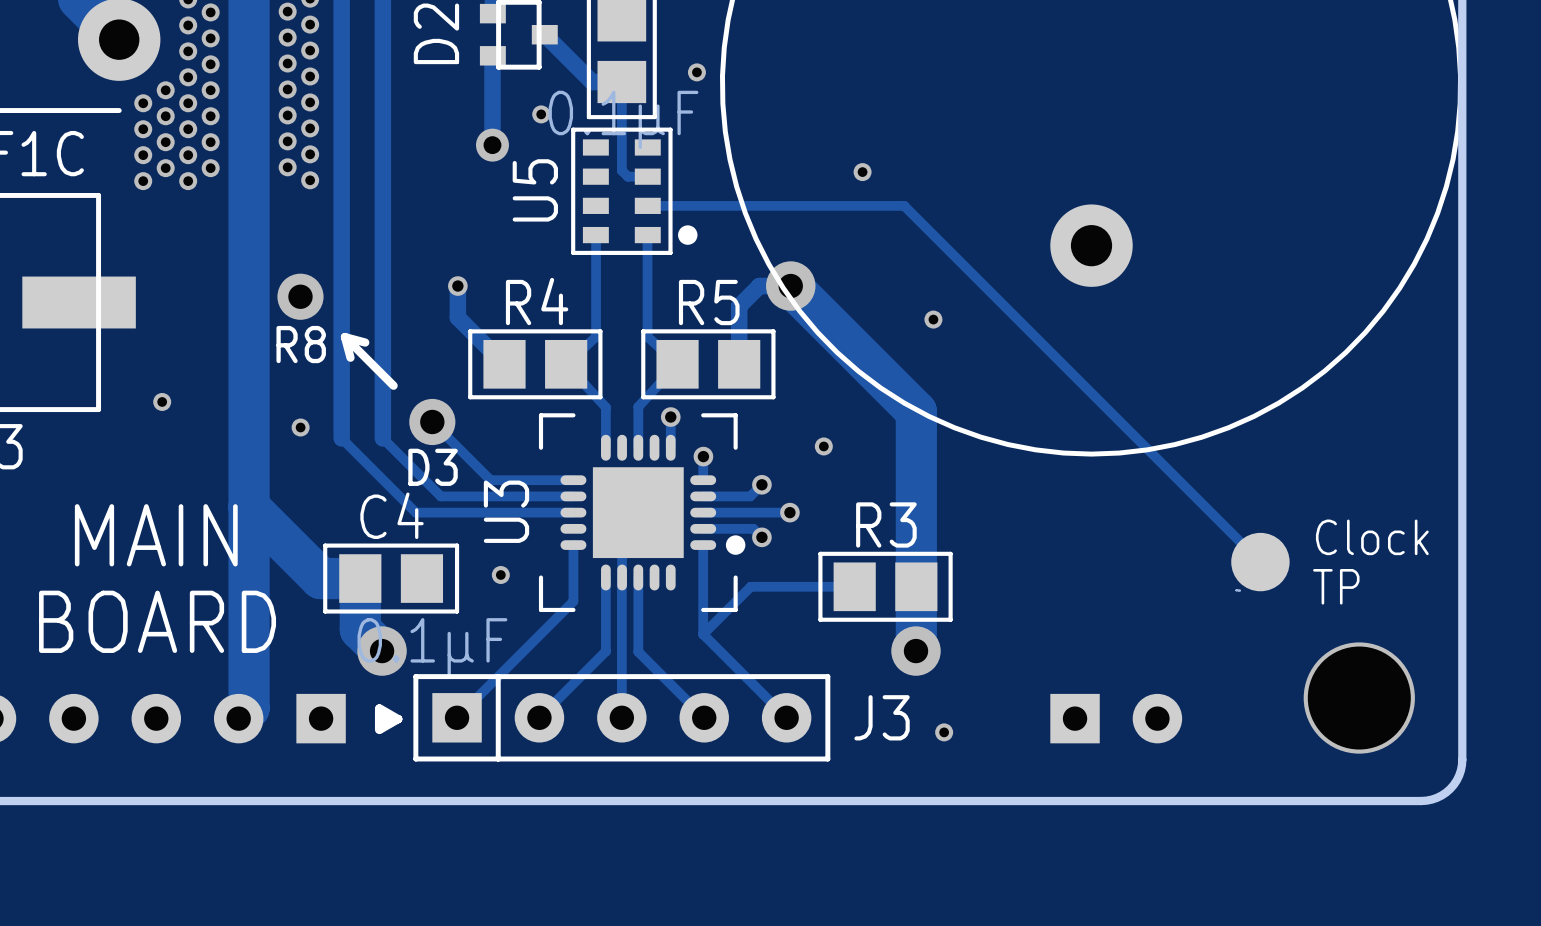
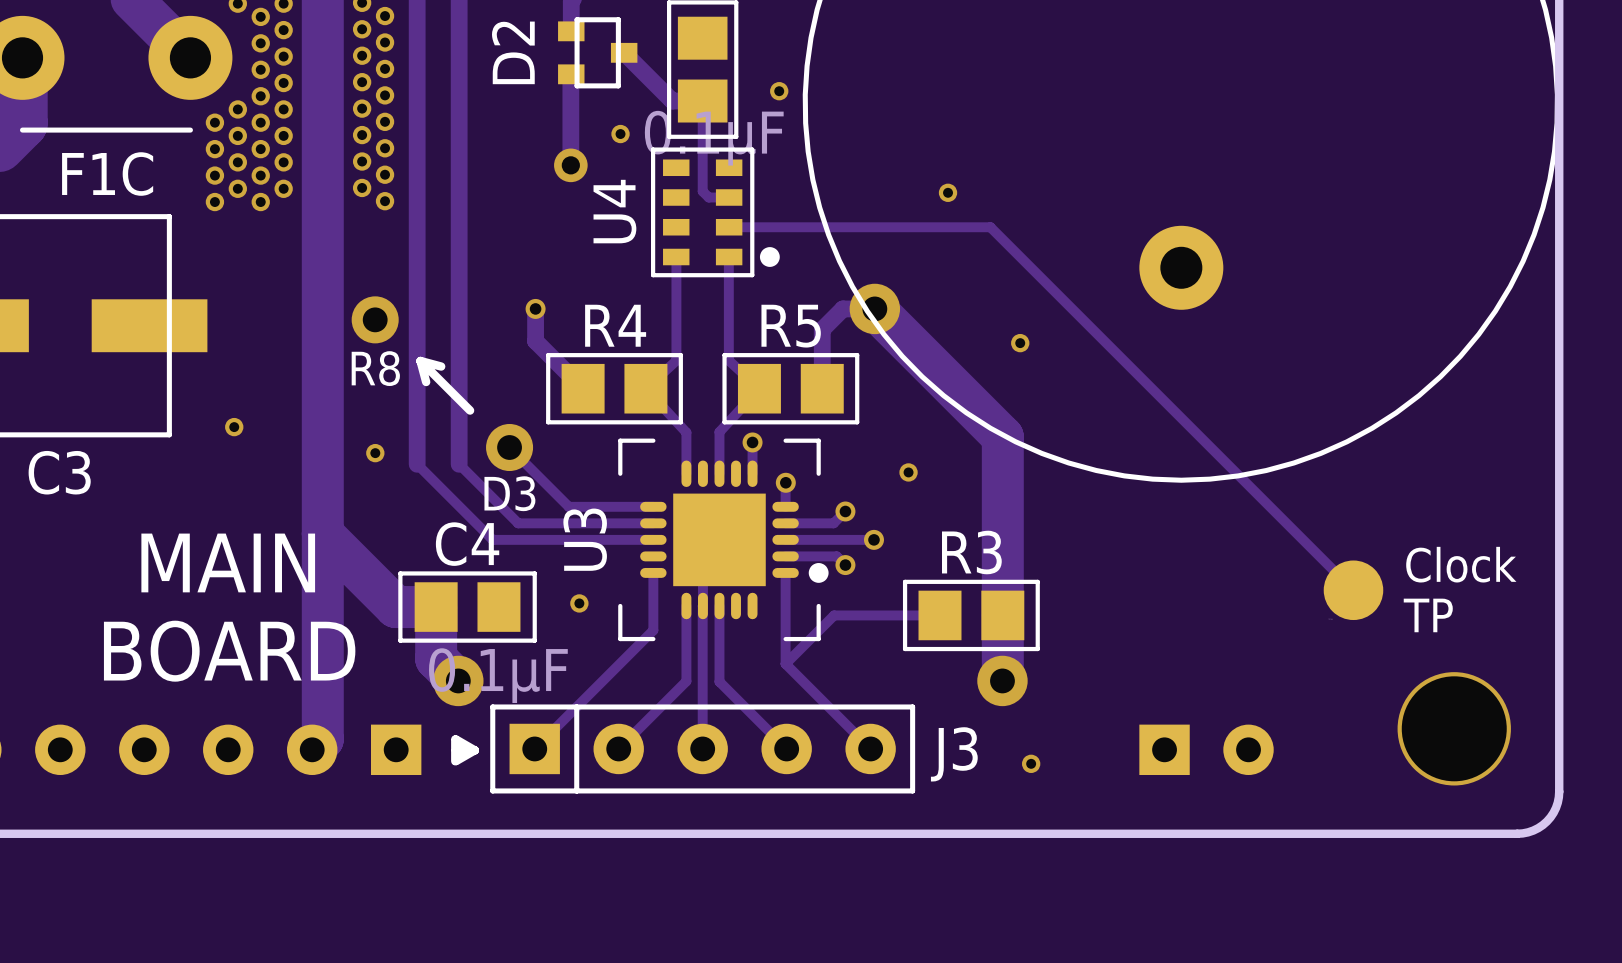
U5 name: U5 (535, 190) -> U4 (614, 211)

